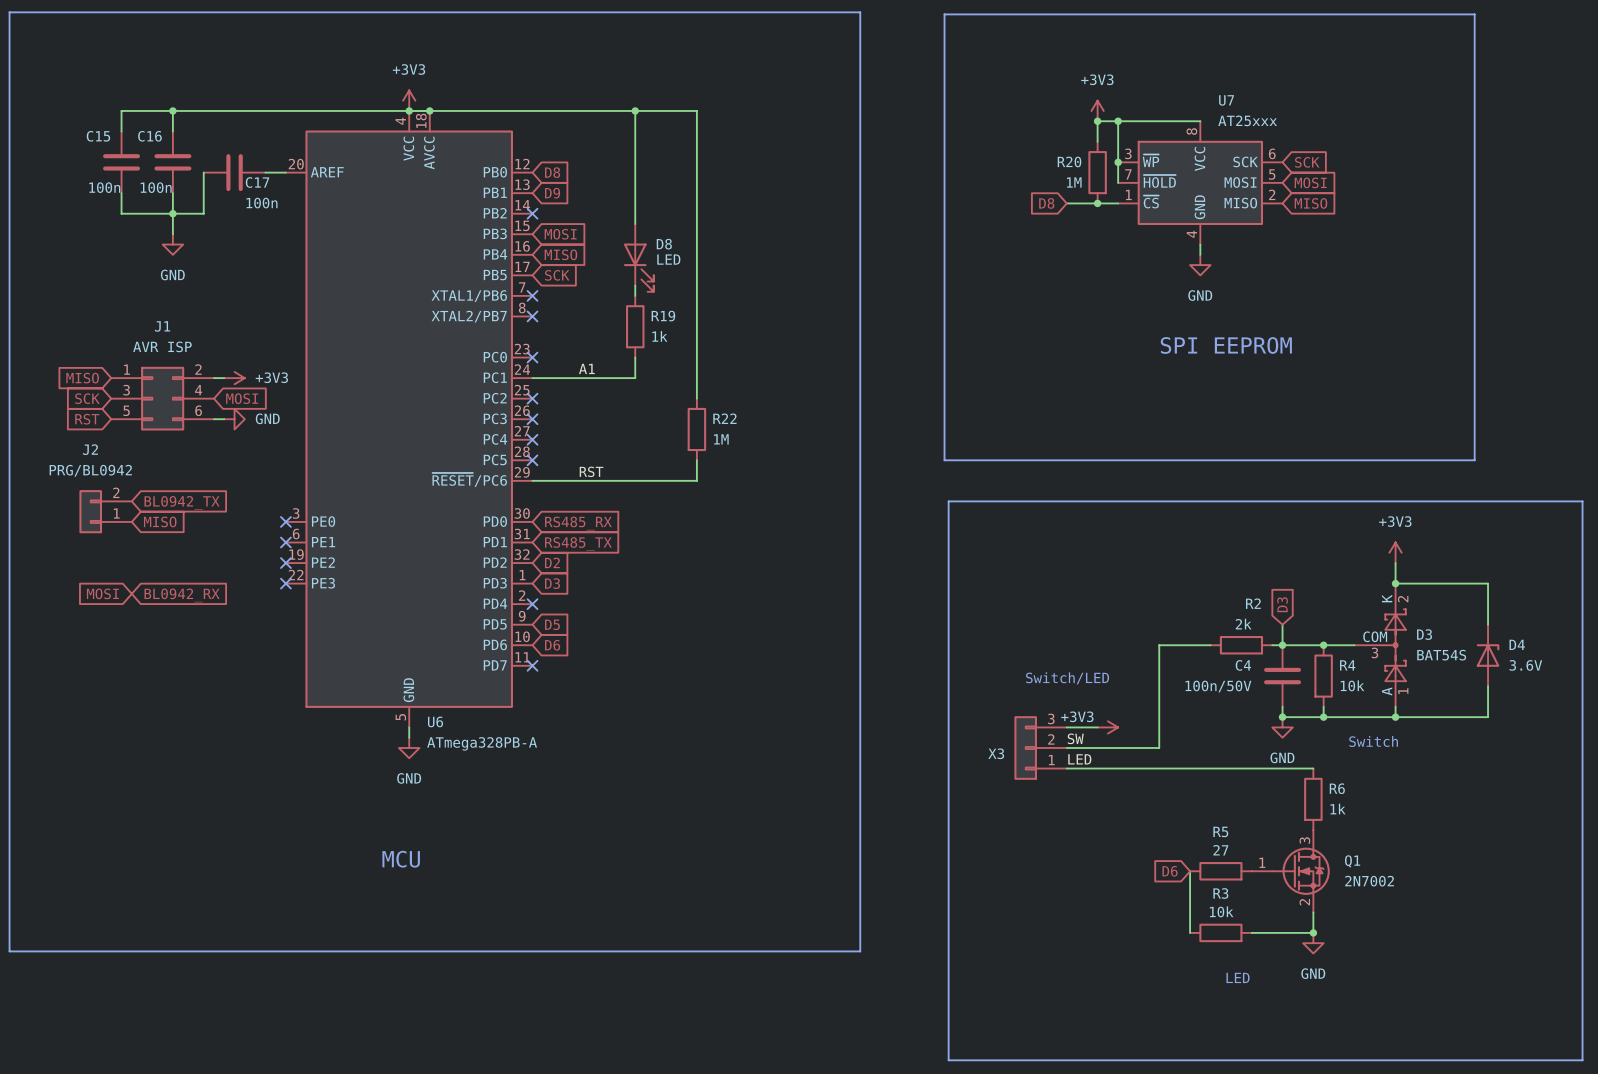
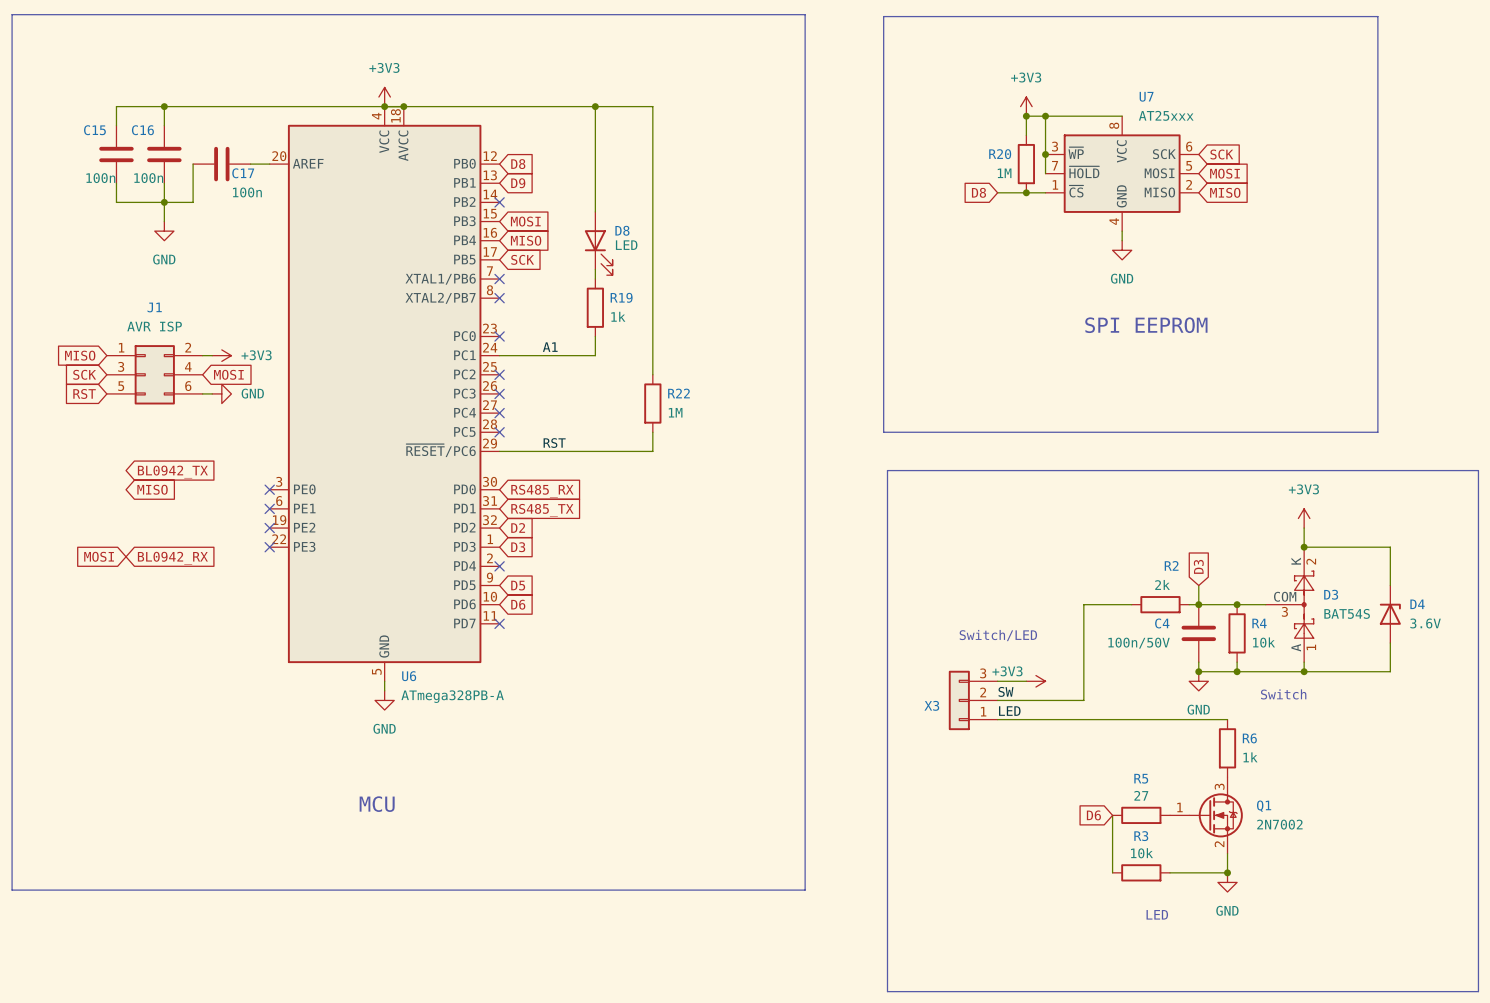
J2: PRG/BL0942 (105, 511) -> none

